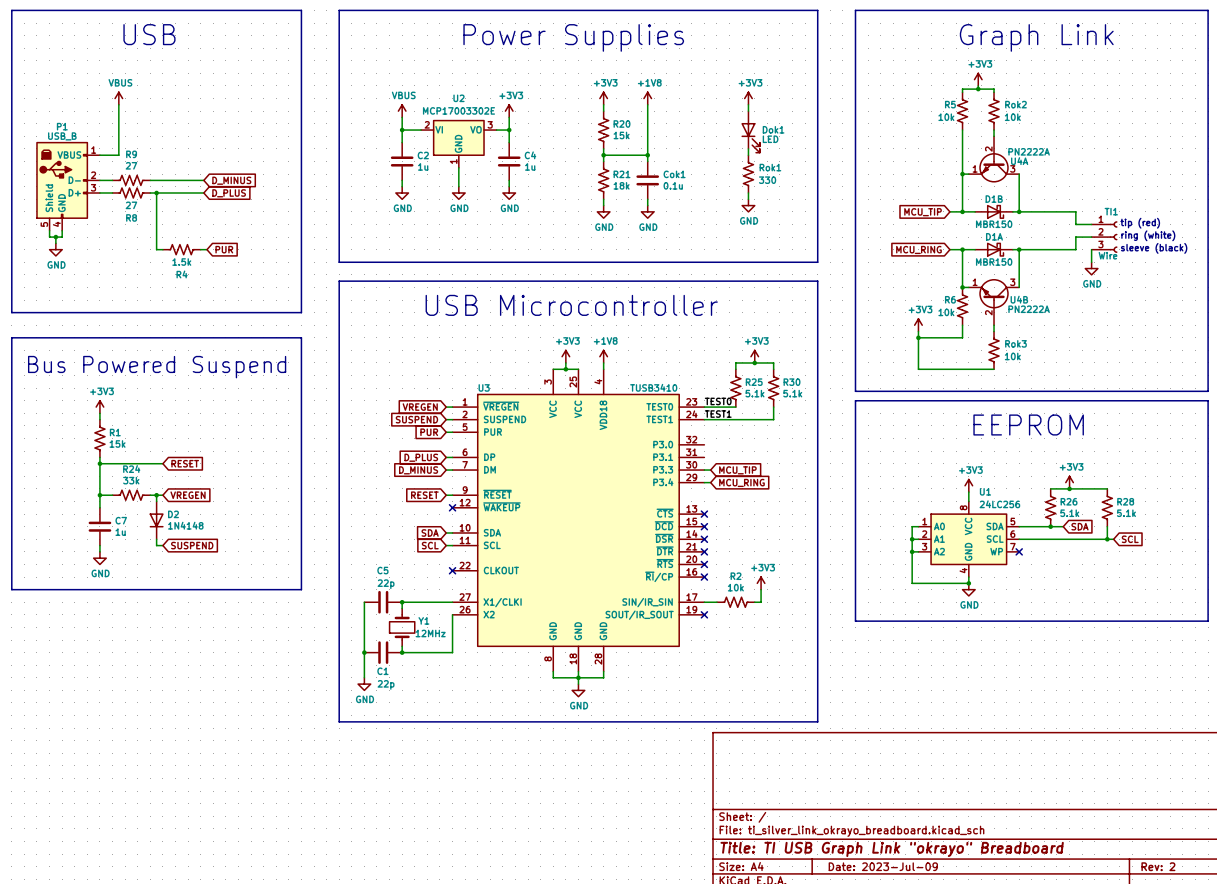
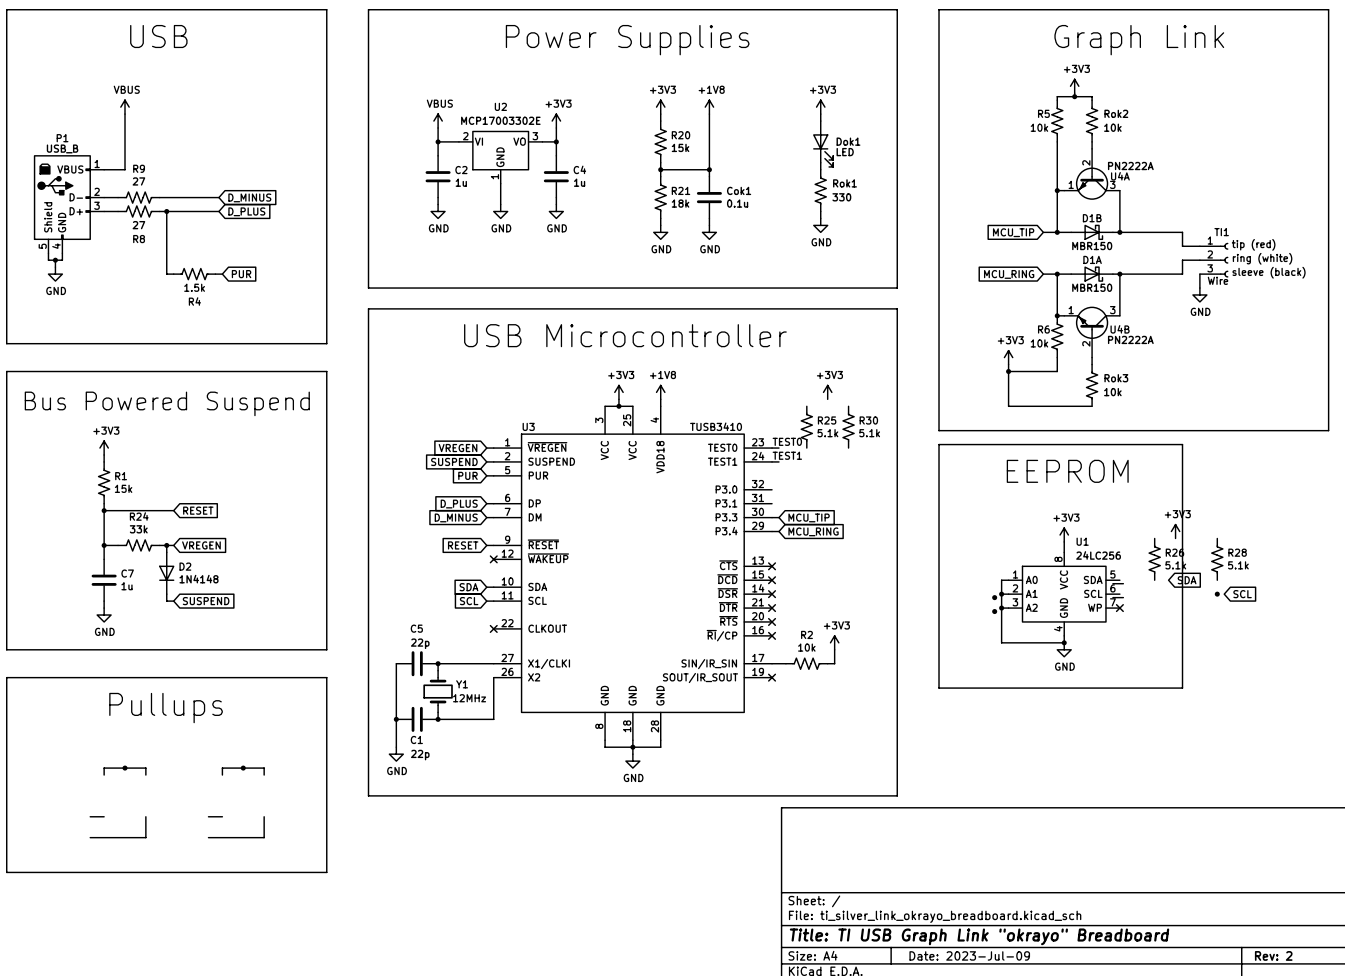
junction: (754, 362) -> none
wire: (735, 369) (735, 362) (773, 362) (773, 369) -> none
line: (855, 403) (855, 400) (1208, 400) (1208, 621) (855, 621) -> (939, 444) (1182, 444) (1182, 688) (939, 688) (939, 684)
wire: (710, 407) (735, 407) -> none
wire: (773, 407) (773, 419) (710, 419) -> none
text position: EEPROM (1028, 425) -> EEPROM (1067, 471)
wire: (1050, 488) (1107, 488) -> none
junction: (1069, 488) -> none
wire: (1019, 526) (1063, 526) -> none
junction: (1050, 526) -> none
wire: (1107, 526) (1107, 539) -> none
wire: none -> (1112, 583) (1123, 583)
wire: (1019, 539) (1113, 539) -> none
junction: none -> (994, 597)
wire: none -> (1112, 597) (1123, 597)
junction: none -> (994, 611)
line: none -> (6, 677) (6, 872) (326, 872) (326, 677) (6, 677)
text: none -> Pullups (166, 708)
junction: none -> (125, 768)
junction: none -> (243, 768)
wire: none -> (104, 775) (104, 768) (145, 768) (145, 775)
wire: none -> (222, 775) (222, 768) (264, 768) (264, 775)
wire: none -> (90, 816) (104, 816)
wire: none -> (145, 816) (145, 837) (90, 837)
wire: none -> (208, 816) (222, 816)
wire: none -> (264, 816) (264, 837) (208, 837)

